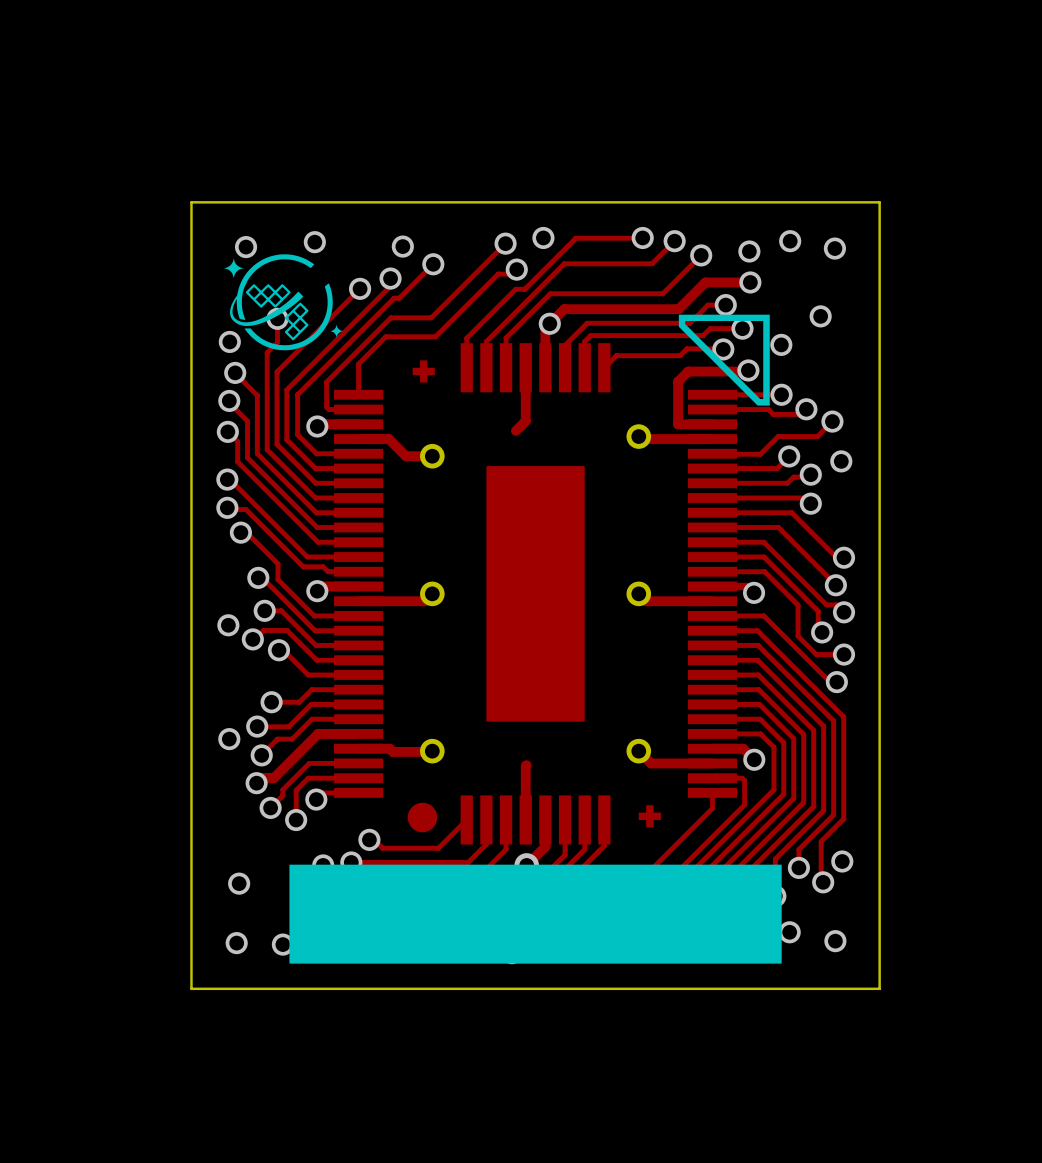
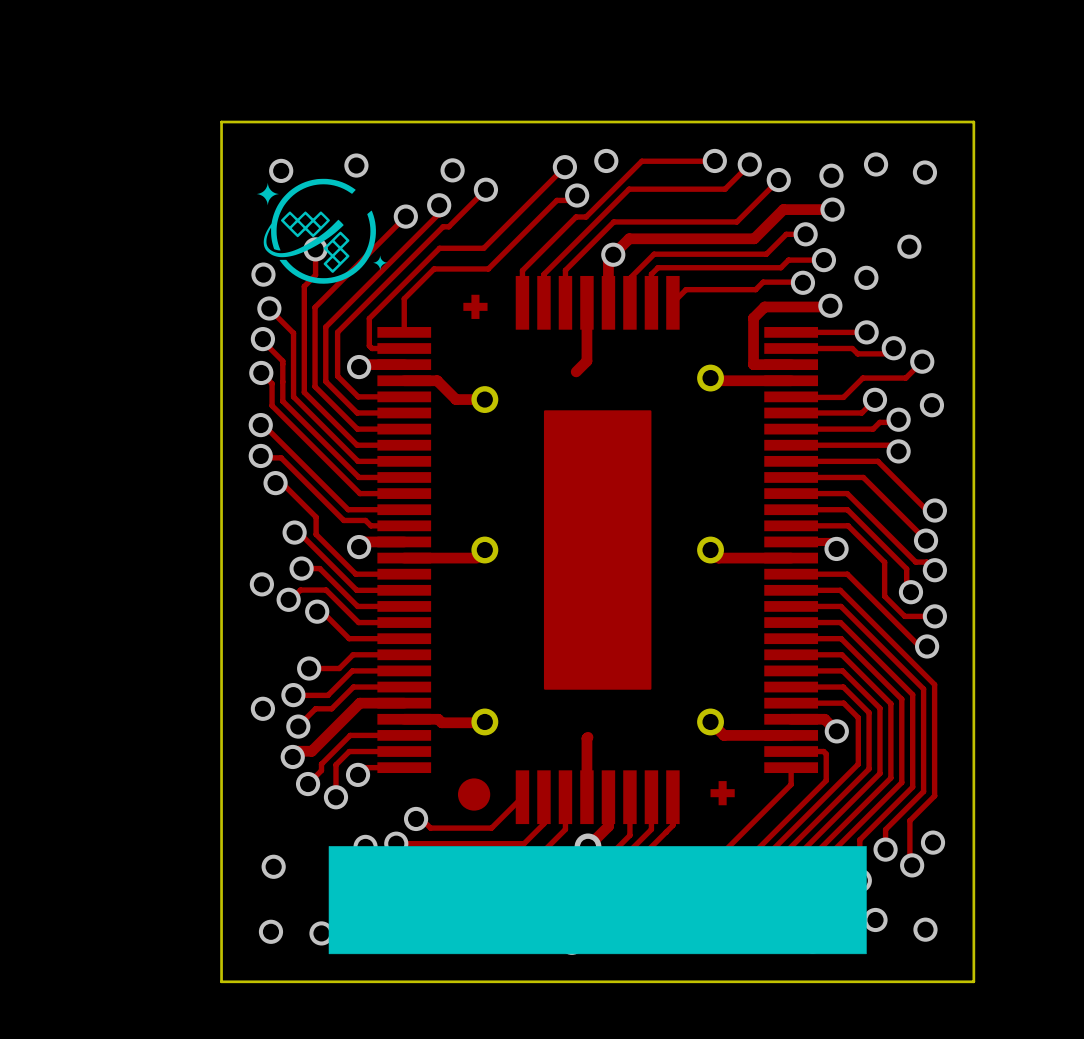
drawing: [678, 314, 770, 406] -> none

